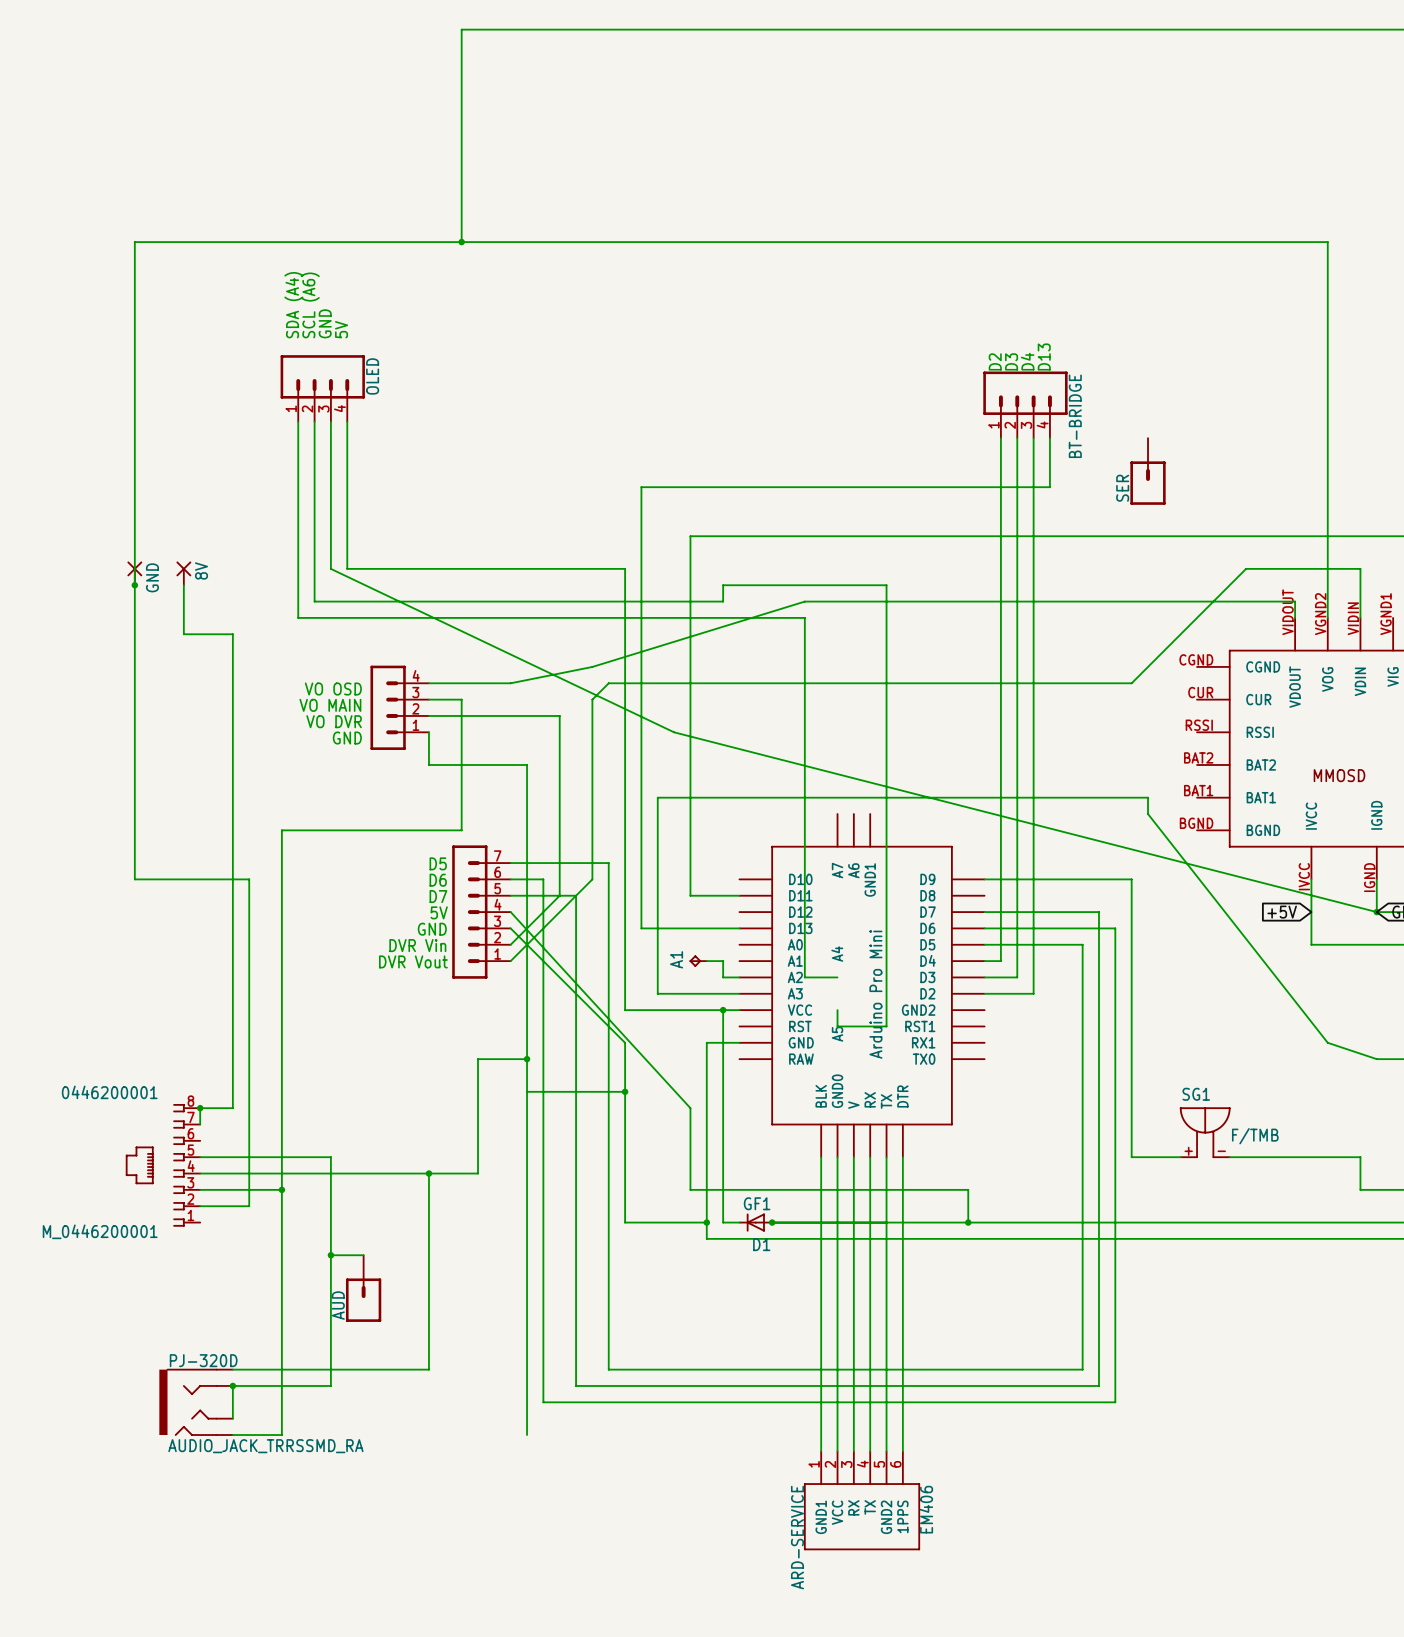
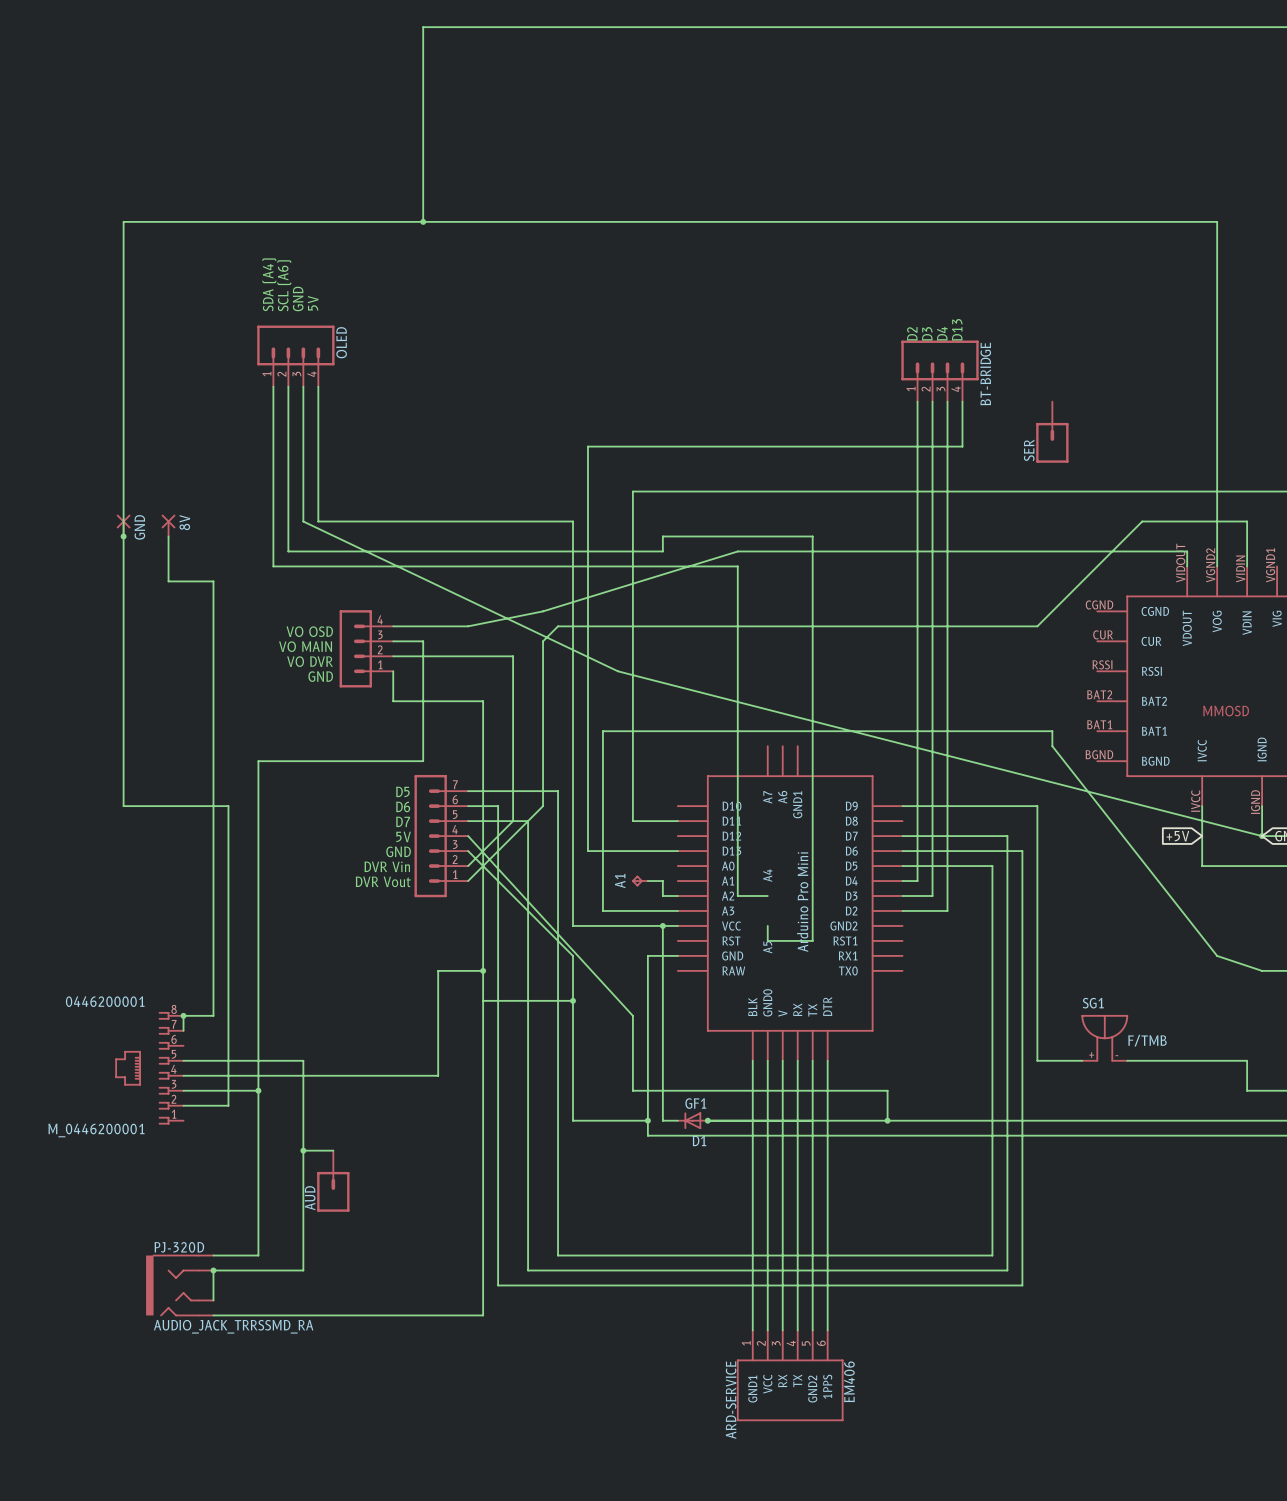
wire: (428, 1173) (428, 1369) (281, 1369) (281, 1435) -> (483, 1315) (258, 1315)
junction: (428, 1173) -> none

